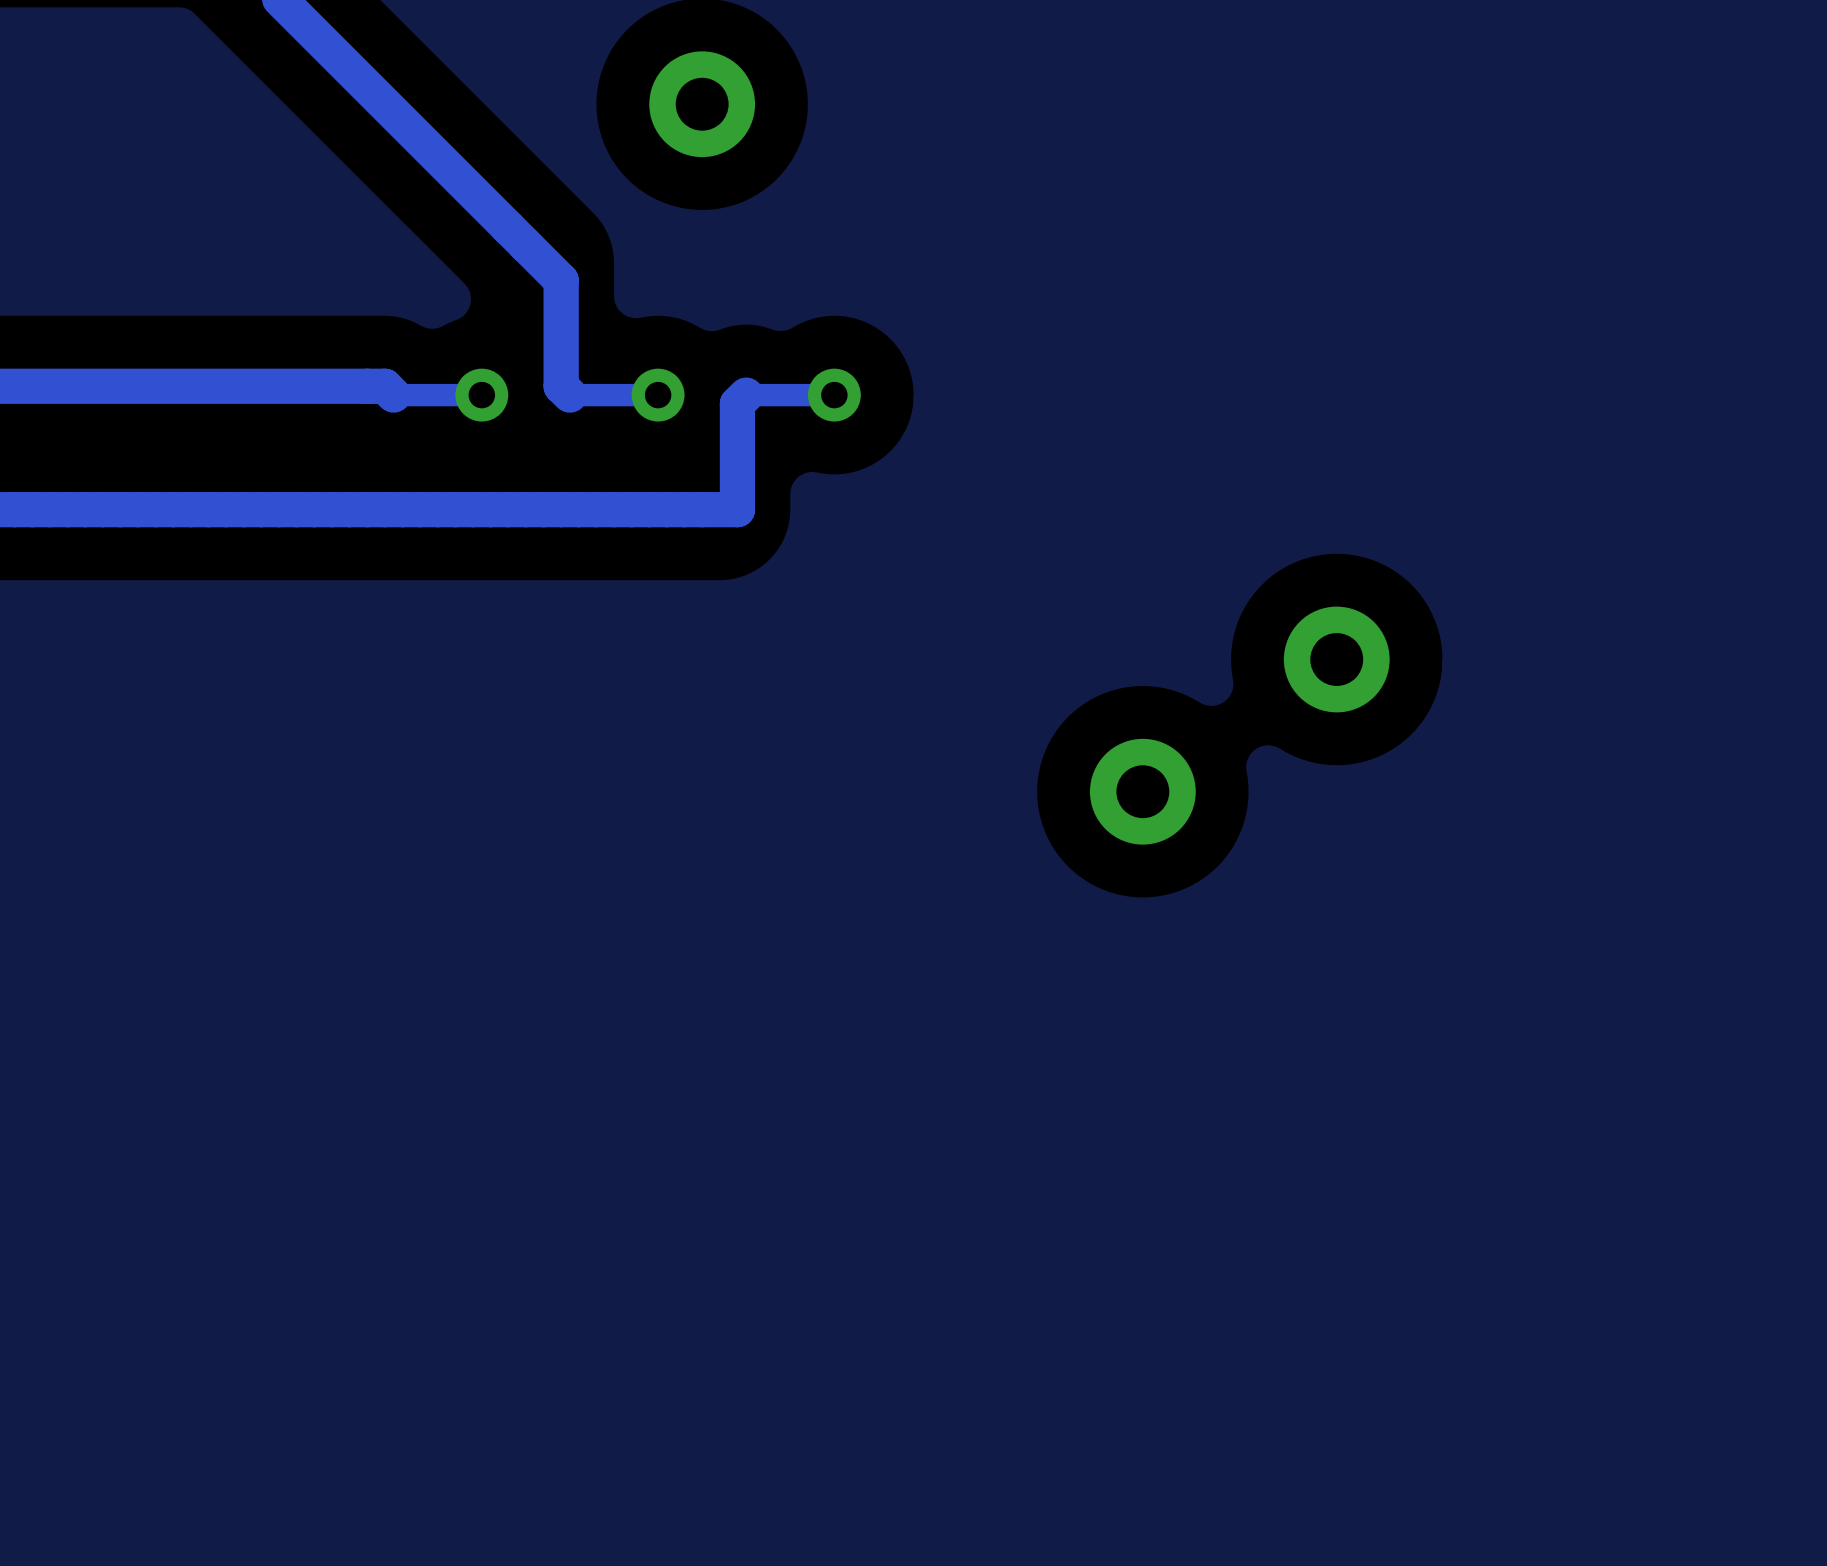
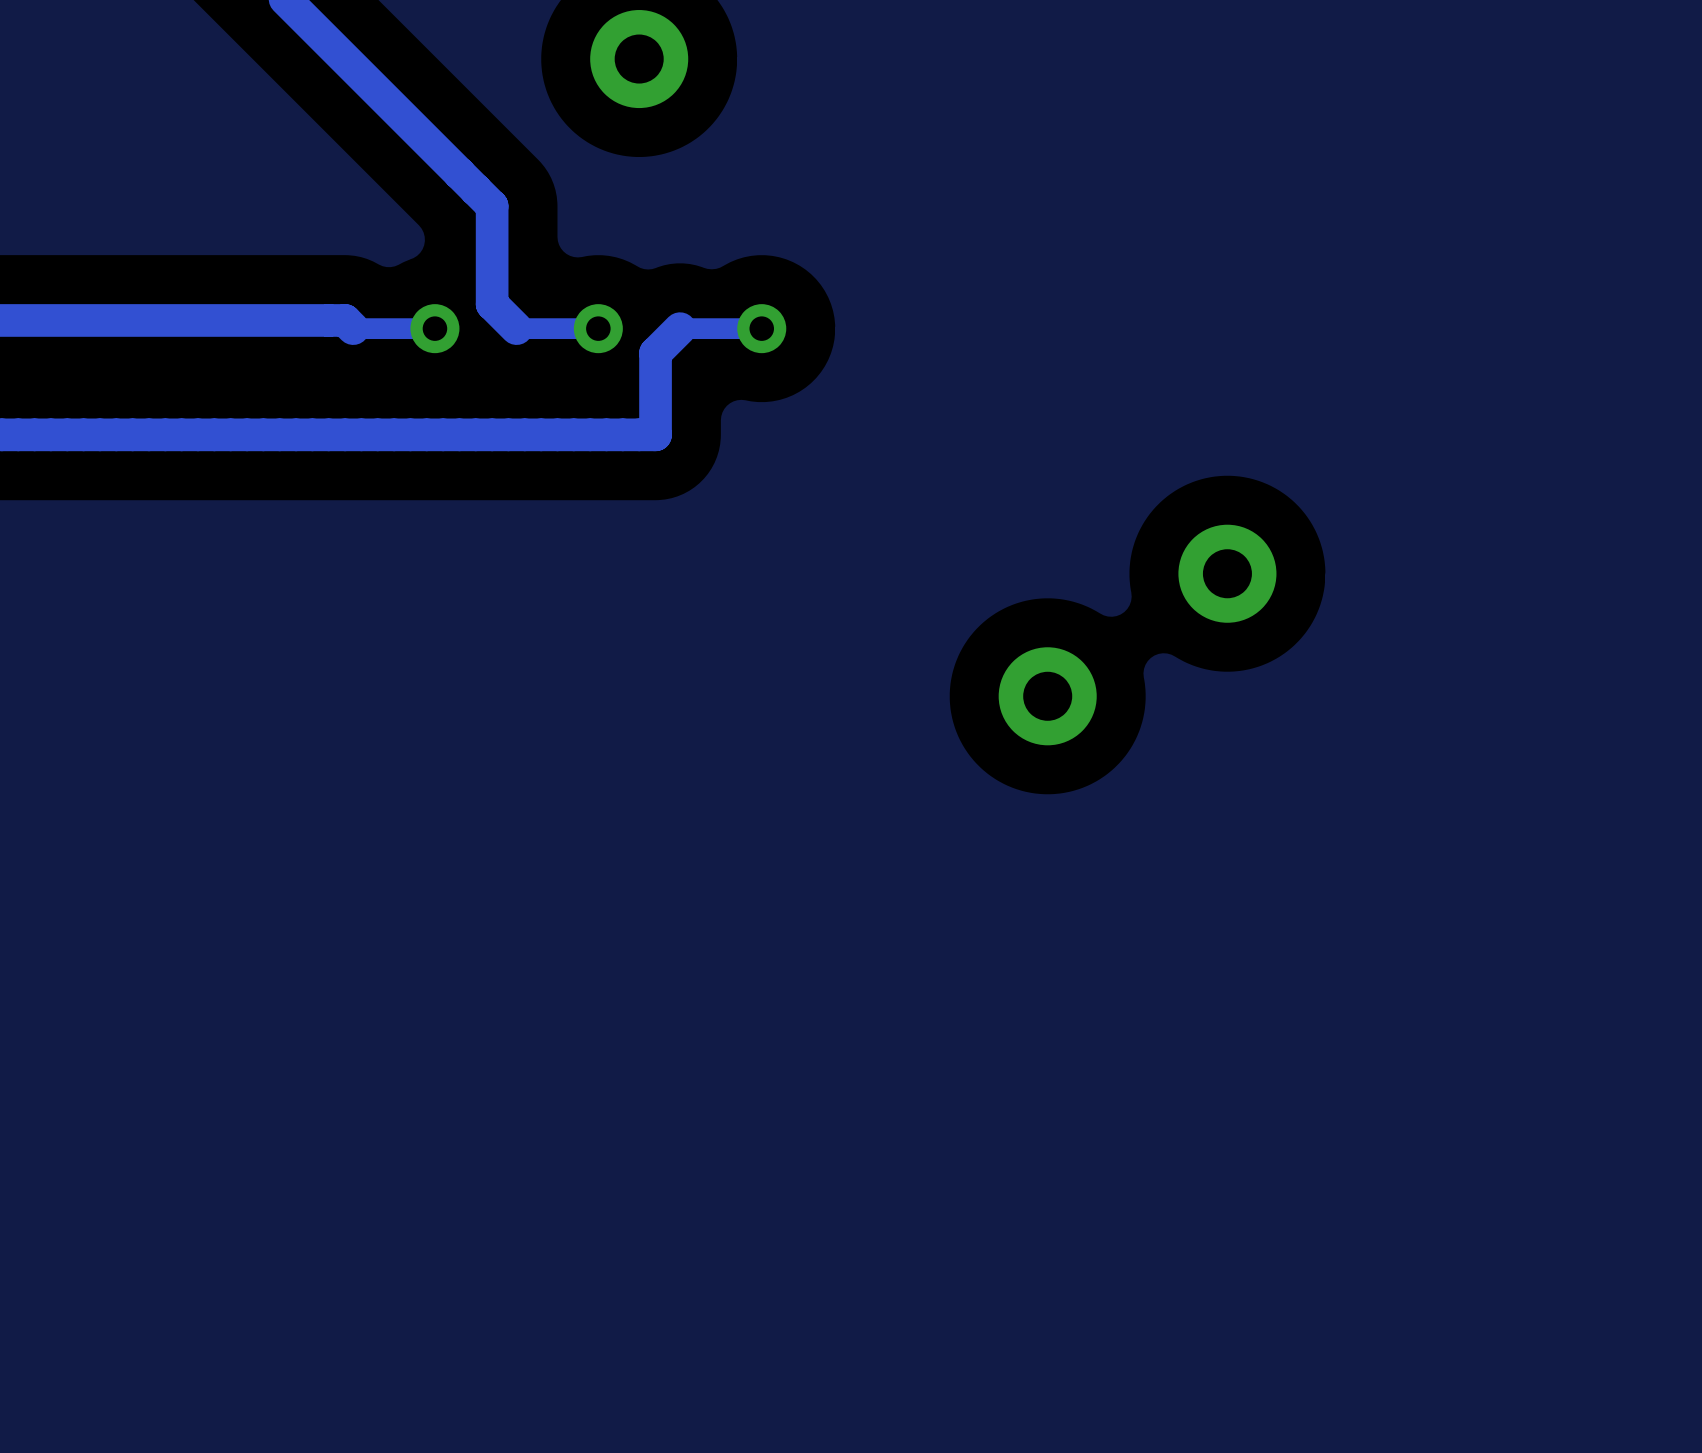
track: (543, 262) (561, 280) (561, 386) -> (492, 206) (492, 304) (508, 320)
track: (737, 403) (737, 509) (719, 509) -> (671, 336) (655, 353) (655, 434)

